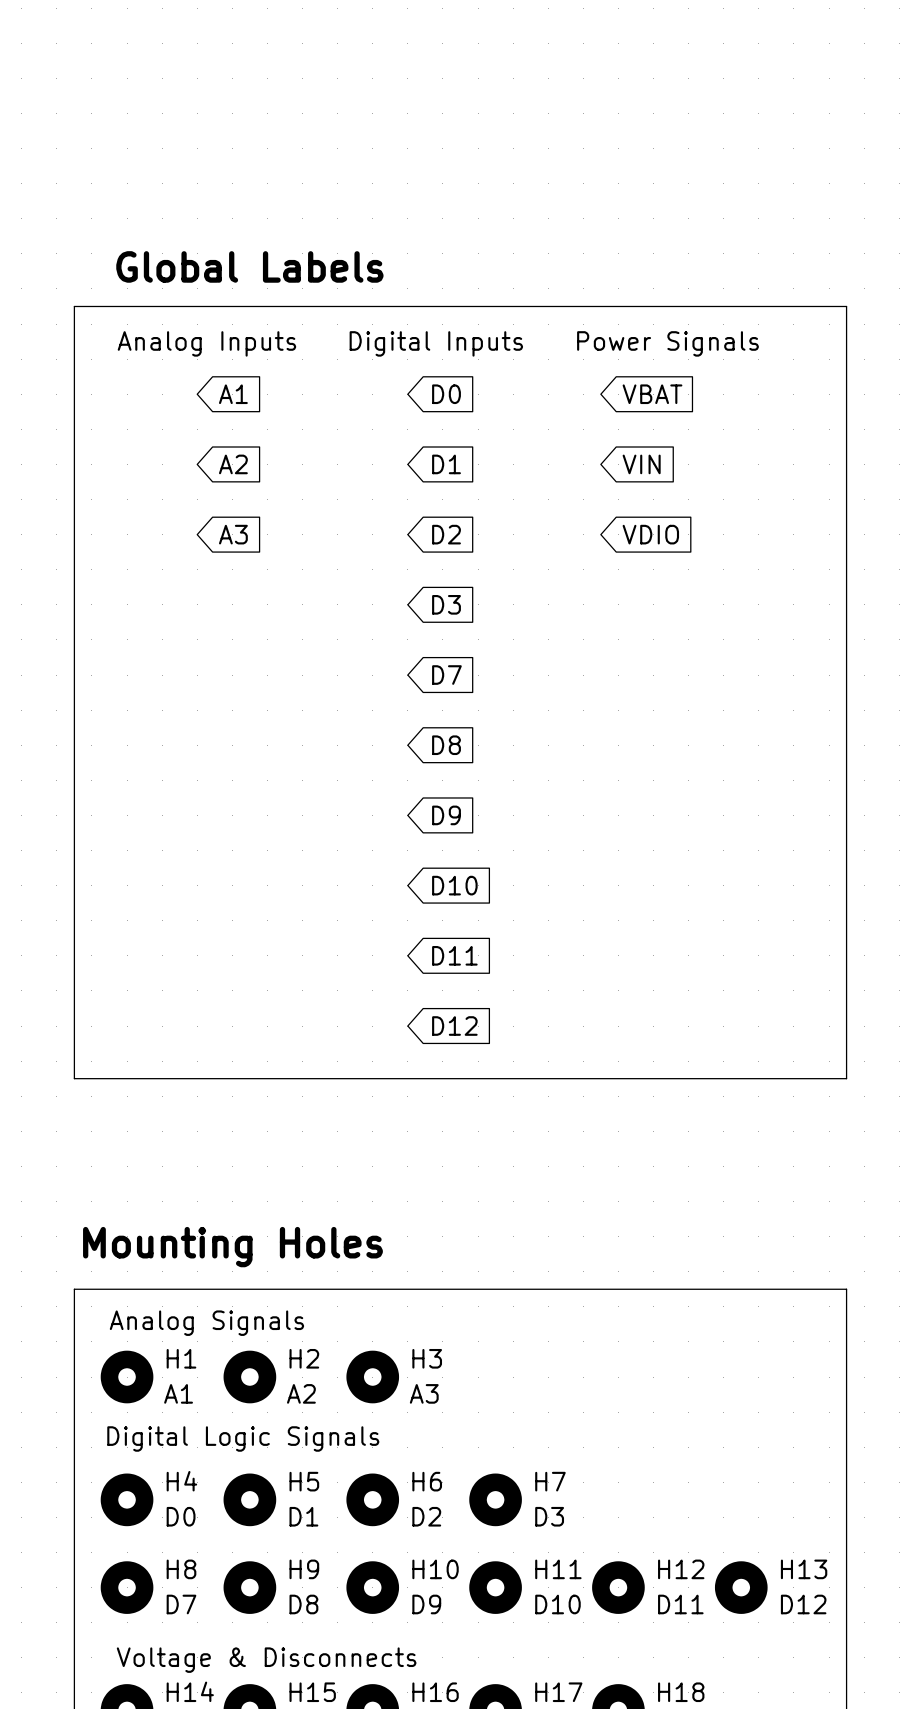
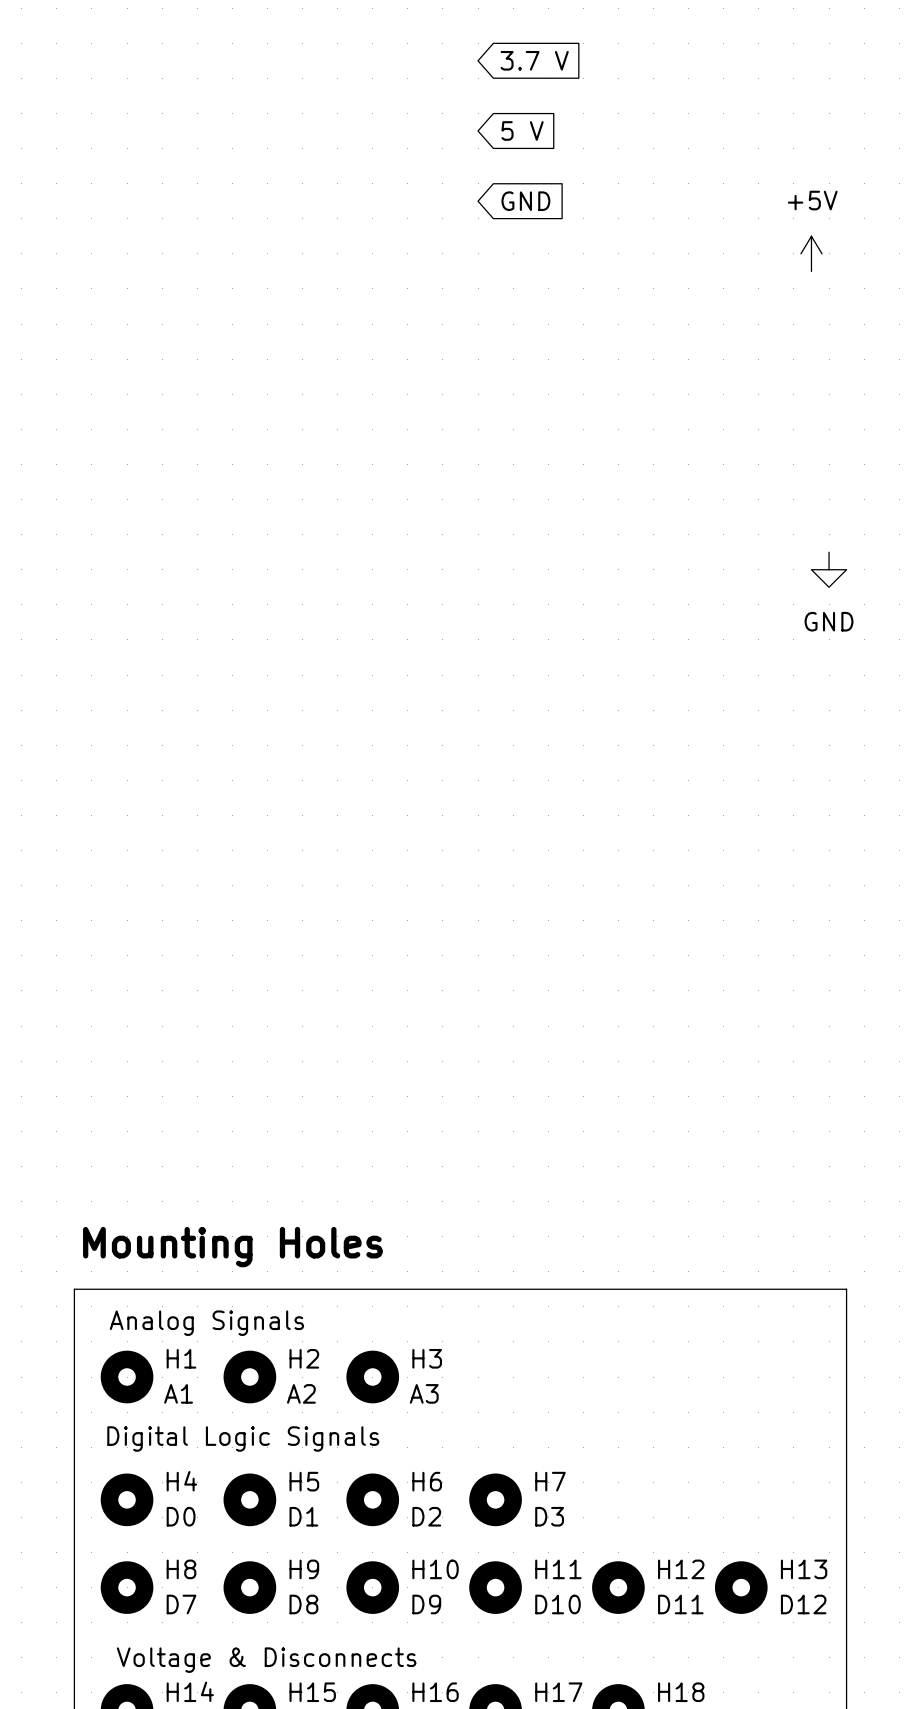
global label: none -> 3.7 V (534, 60)
global label: none -> 5 V (522, 130)
global label: none -> GND (525, 201)
power symbol: none -> +5V (811, 253)
text: Global Labels (249, 266) -> none
line: (74, 306) (846, 306) (846, 1078) (74, 1078) (74, 306) -> none
text: Analog Inputs (206, 343) -> none
text: Digital Inputs (436, 343) -> none
text: Power Signals (667, 343) -> none
global label: A1 (233, 394) -> none
global label: D0 (446, 394) -> none
global label: VBAT (652, 394) -> none
global label: A2 (233, 464) -> none
global label: D1 (446, 464) -> none
global label: VIN (641, 464) -> none
global label: A3 (233, 534) -> none
global label: D2 (446, 534) -> none
global label: VDIO (650, 534) -> none
power symbol: none -> GND (829, 569)
global label: D3 (446, 604) -> none
global label: D7 (446, 675) -> none
global label: D8 (446, 745) -> none
global label: D9 (446, 815) -> none
global label: D10 (454, 885) -> none
global label: D11 (454, 955) -> none
global label: D12 (454, 1026) -> none

